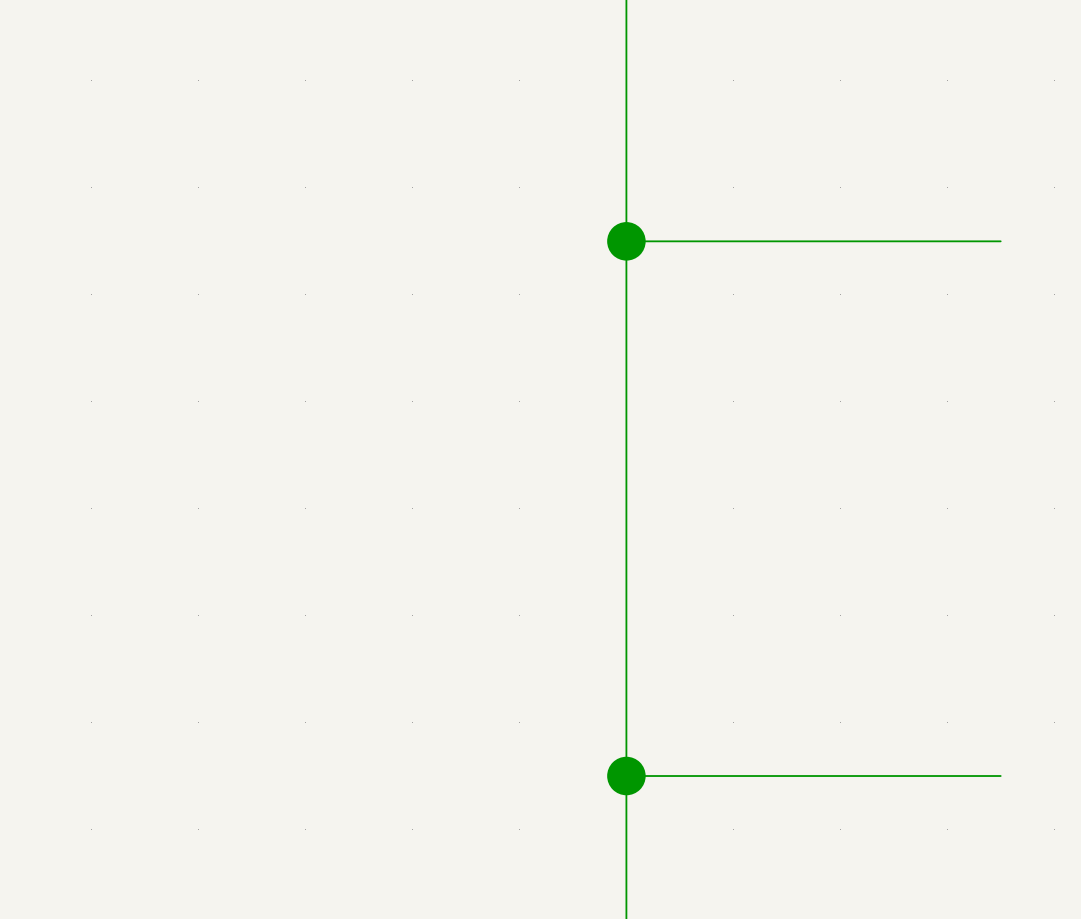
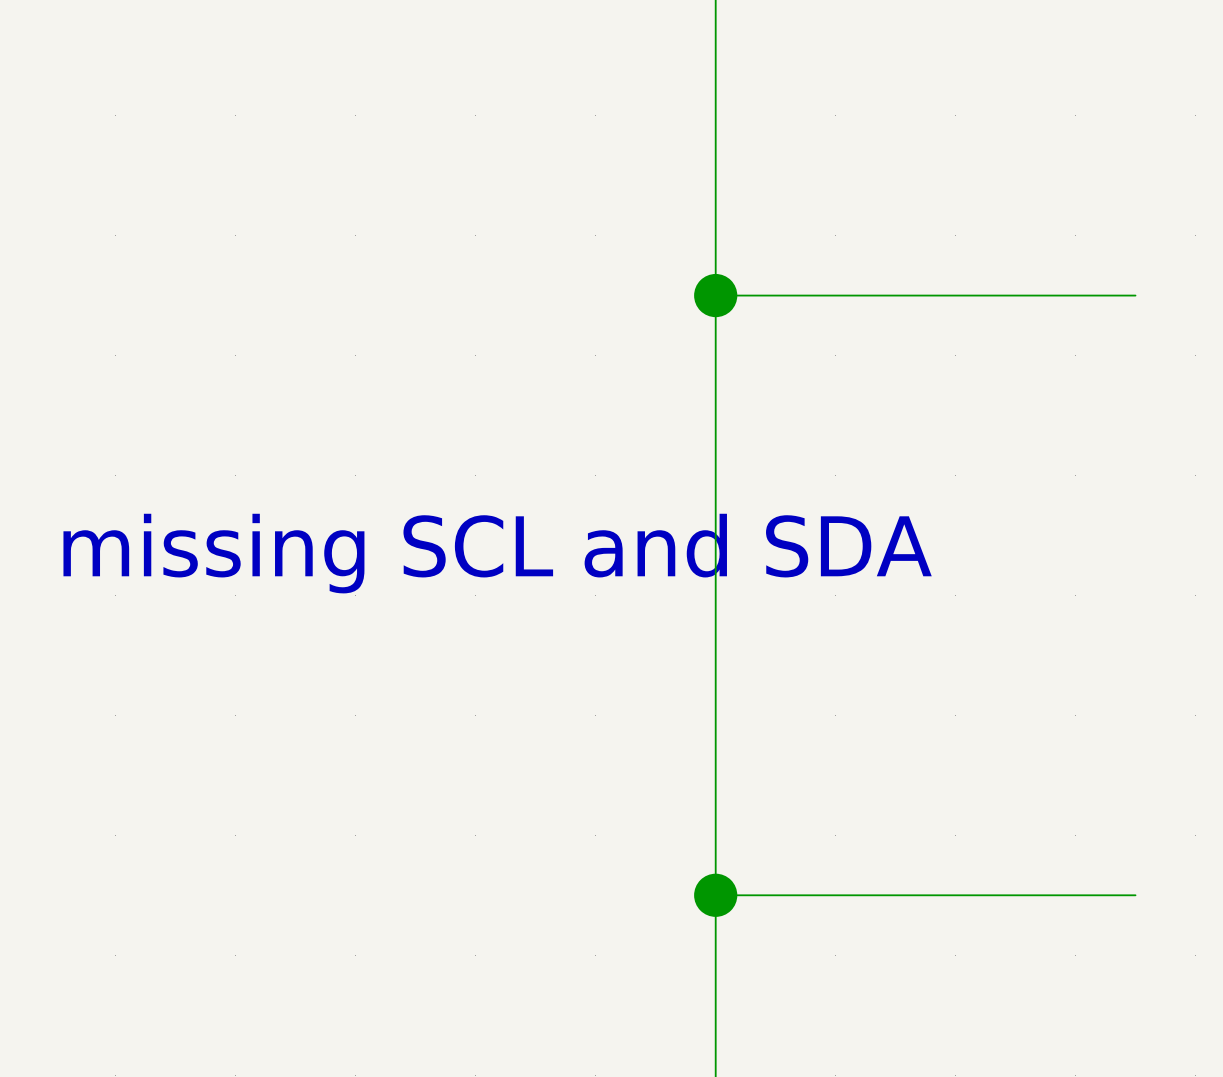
text: none -> missing SCL and SDA (497, 553)

